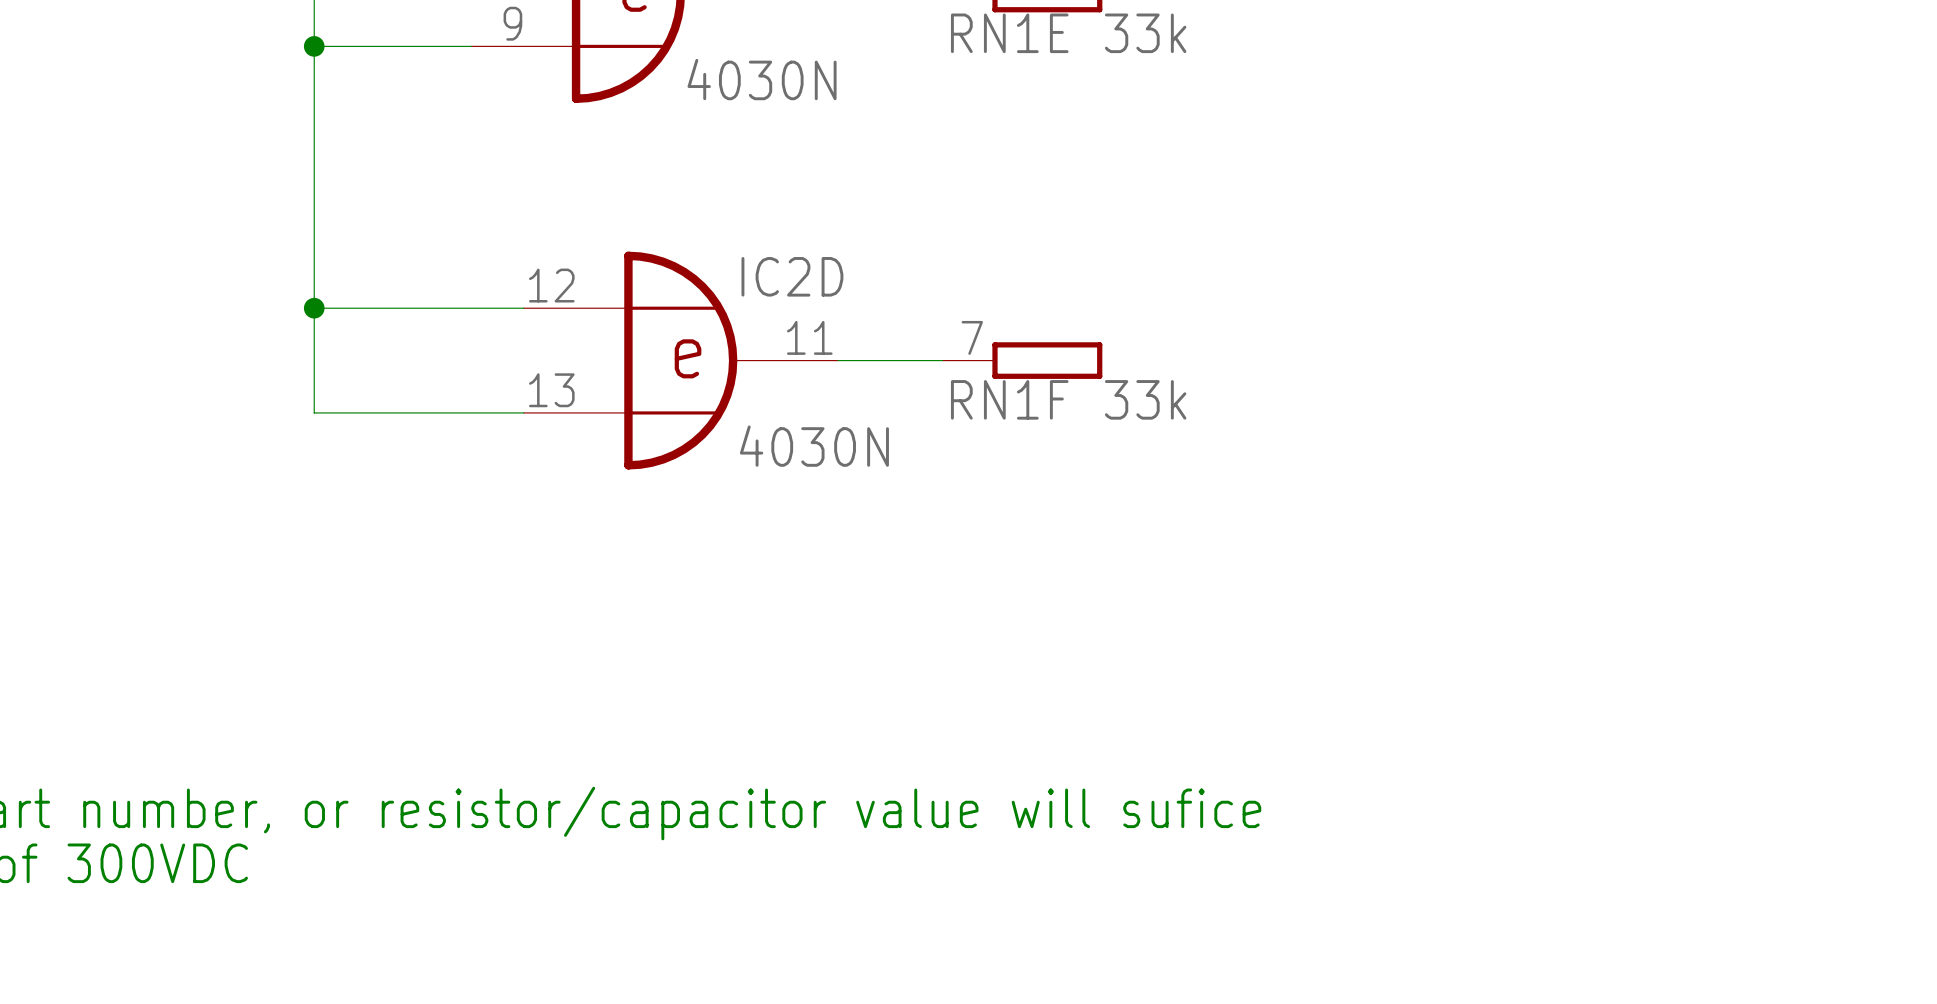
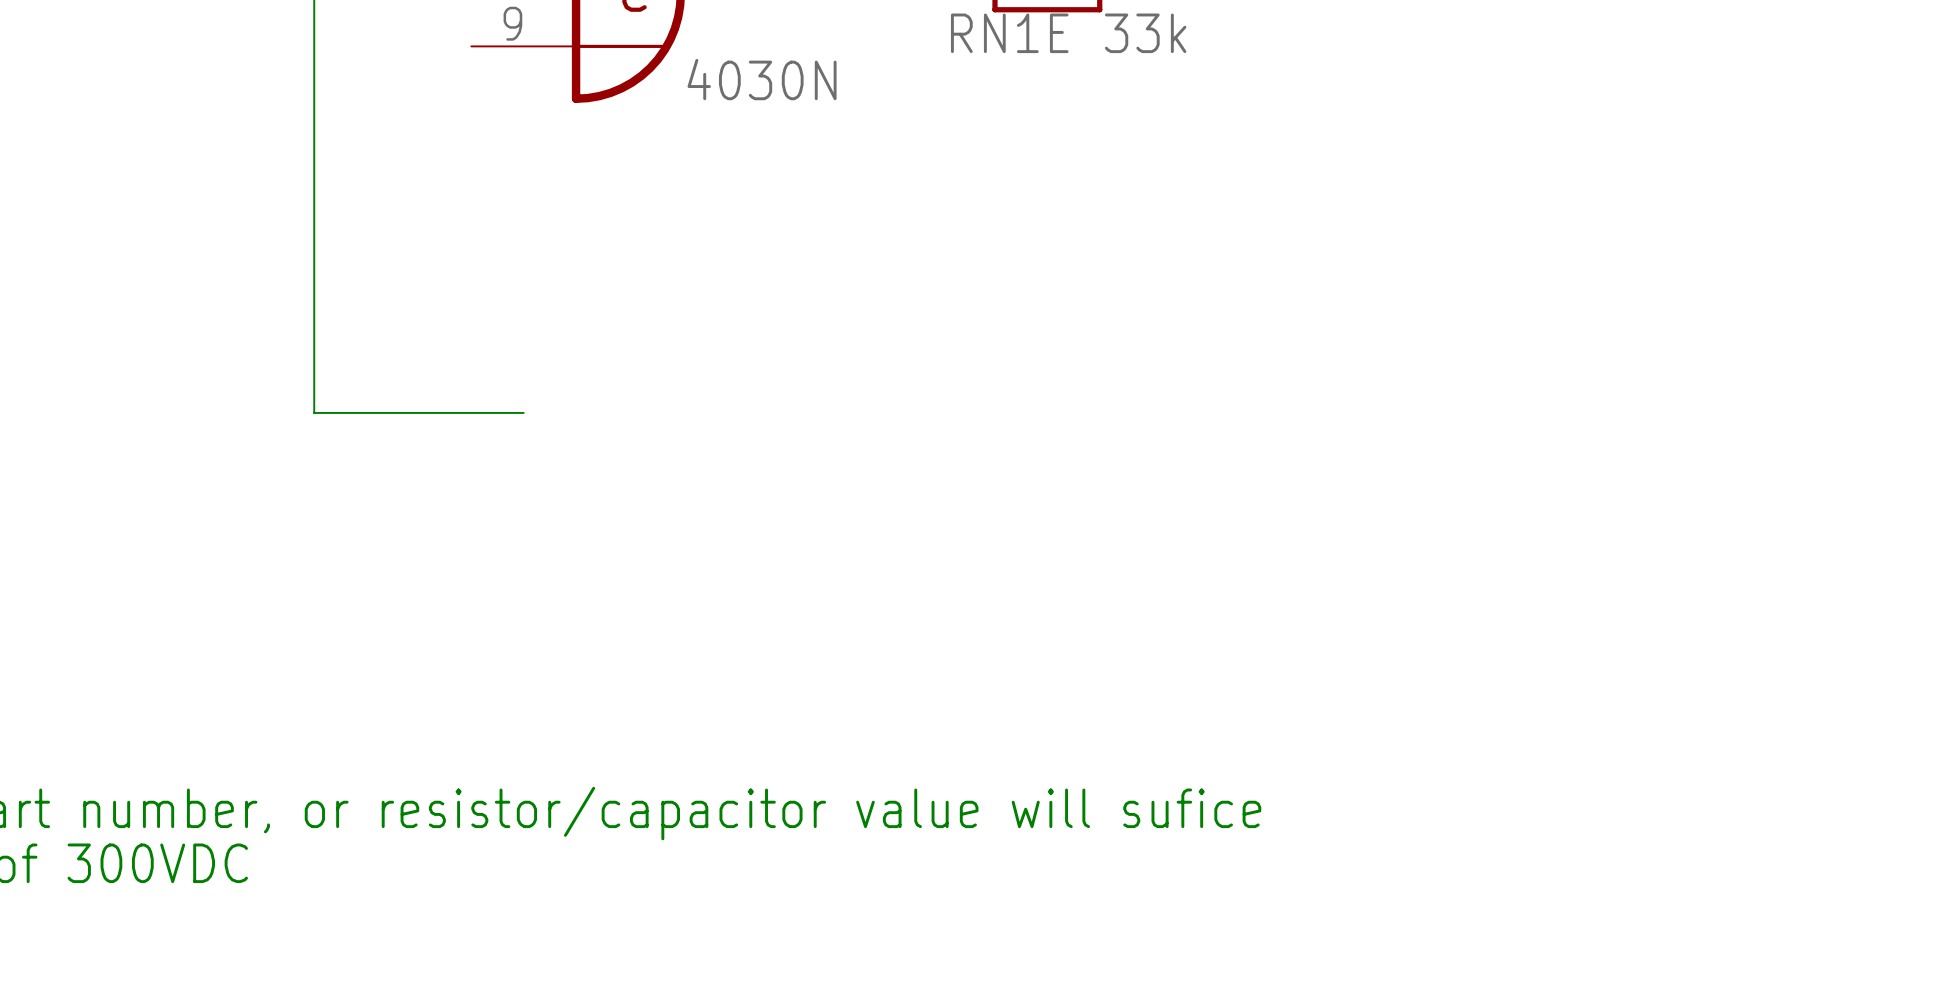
wire: (314, 46) (471, 46) -> none
junction: (314, 46) -> none
wire: (314, 308) (523, 308) -> none
junction: (314, 308) -> none
IC2D: 4030N (680, 360) -> none
wire: (837, 360) (942, 360) -> none
RN1F: 33k (1022, 360) -> none

